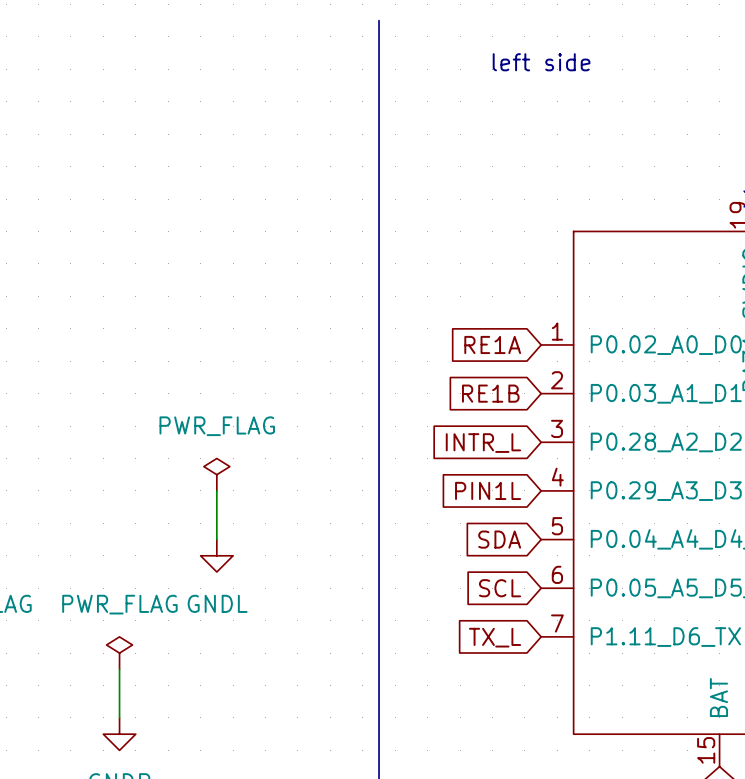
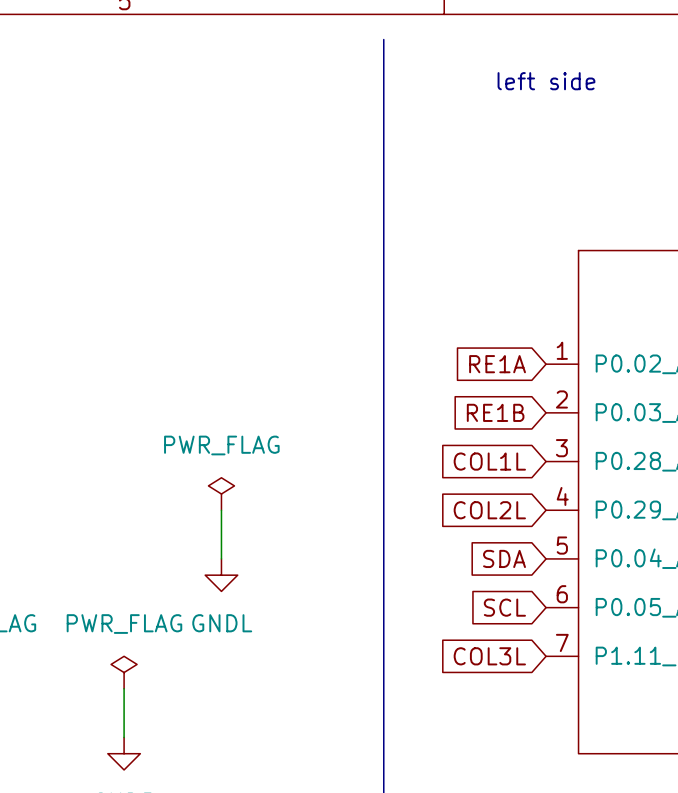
global label: INTR_L (483, 443) -> COL1L (489, 461)
global label: PIN1L (488, 490) -> COL2L (489, 510)
global label: TX_L (495, 637) -> COL3L (489, 656)

